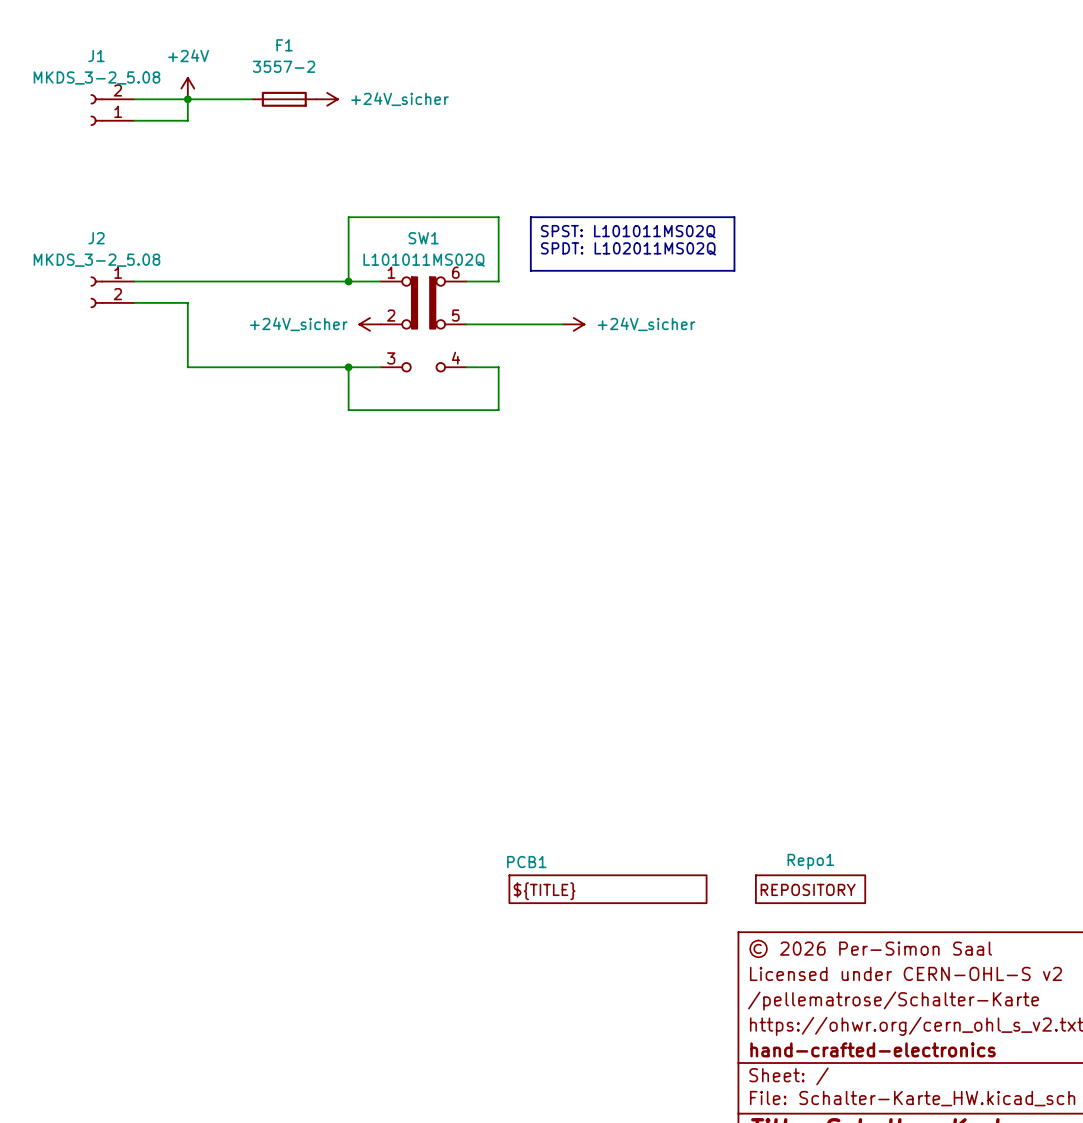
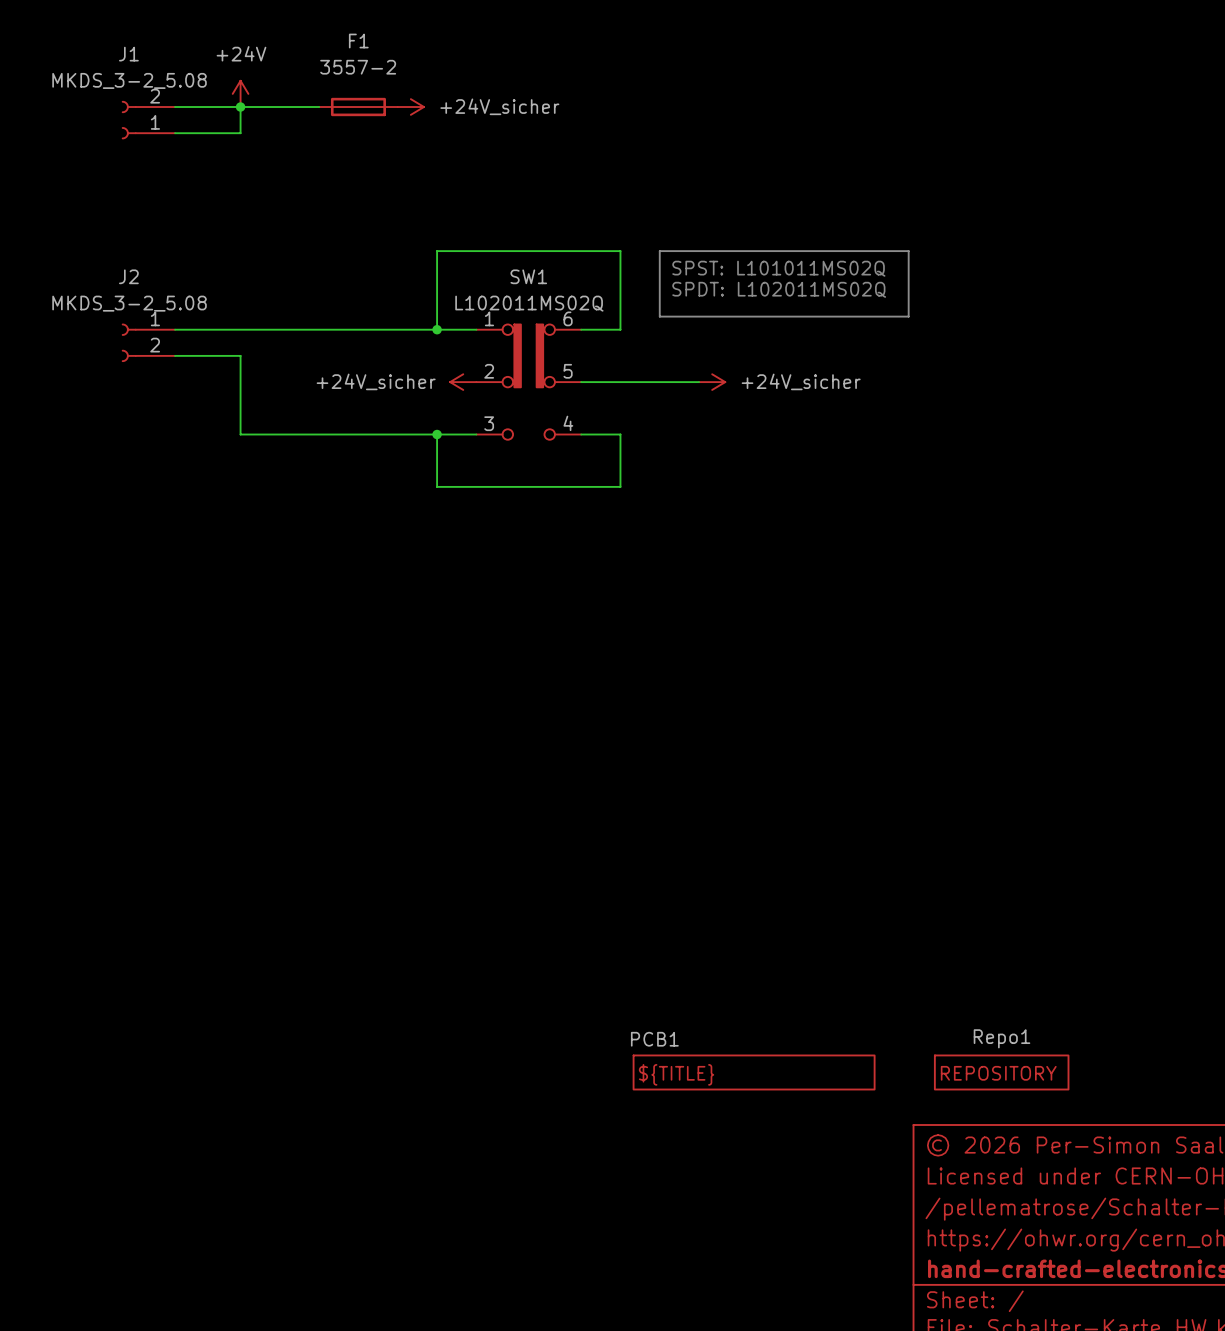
SW1 value: L101011MS02Q (424, 260) -> L102011MS02Q (529, 303)

